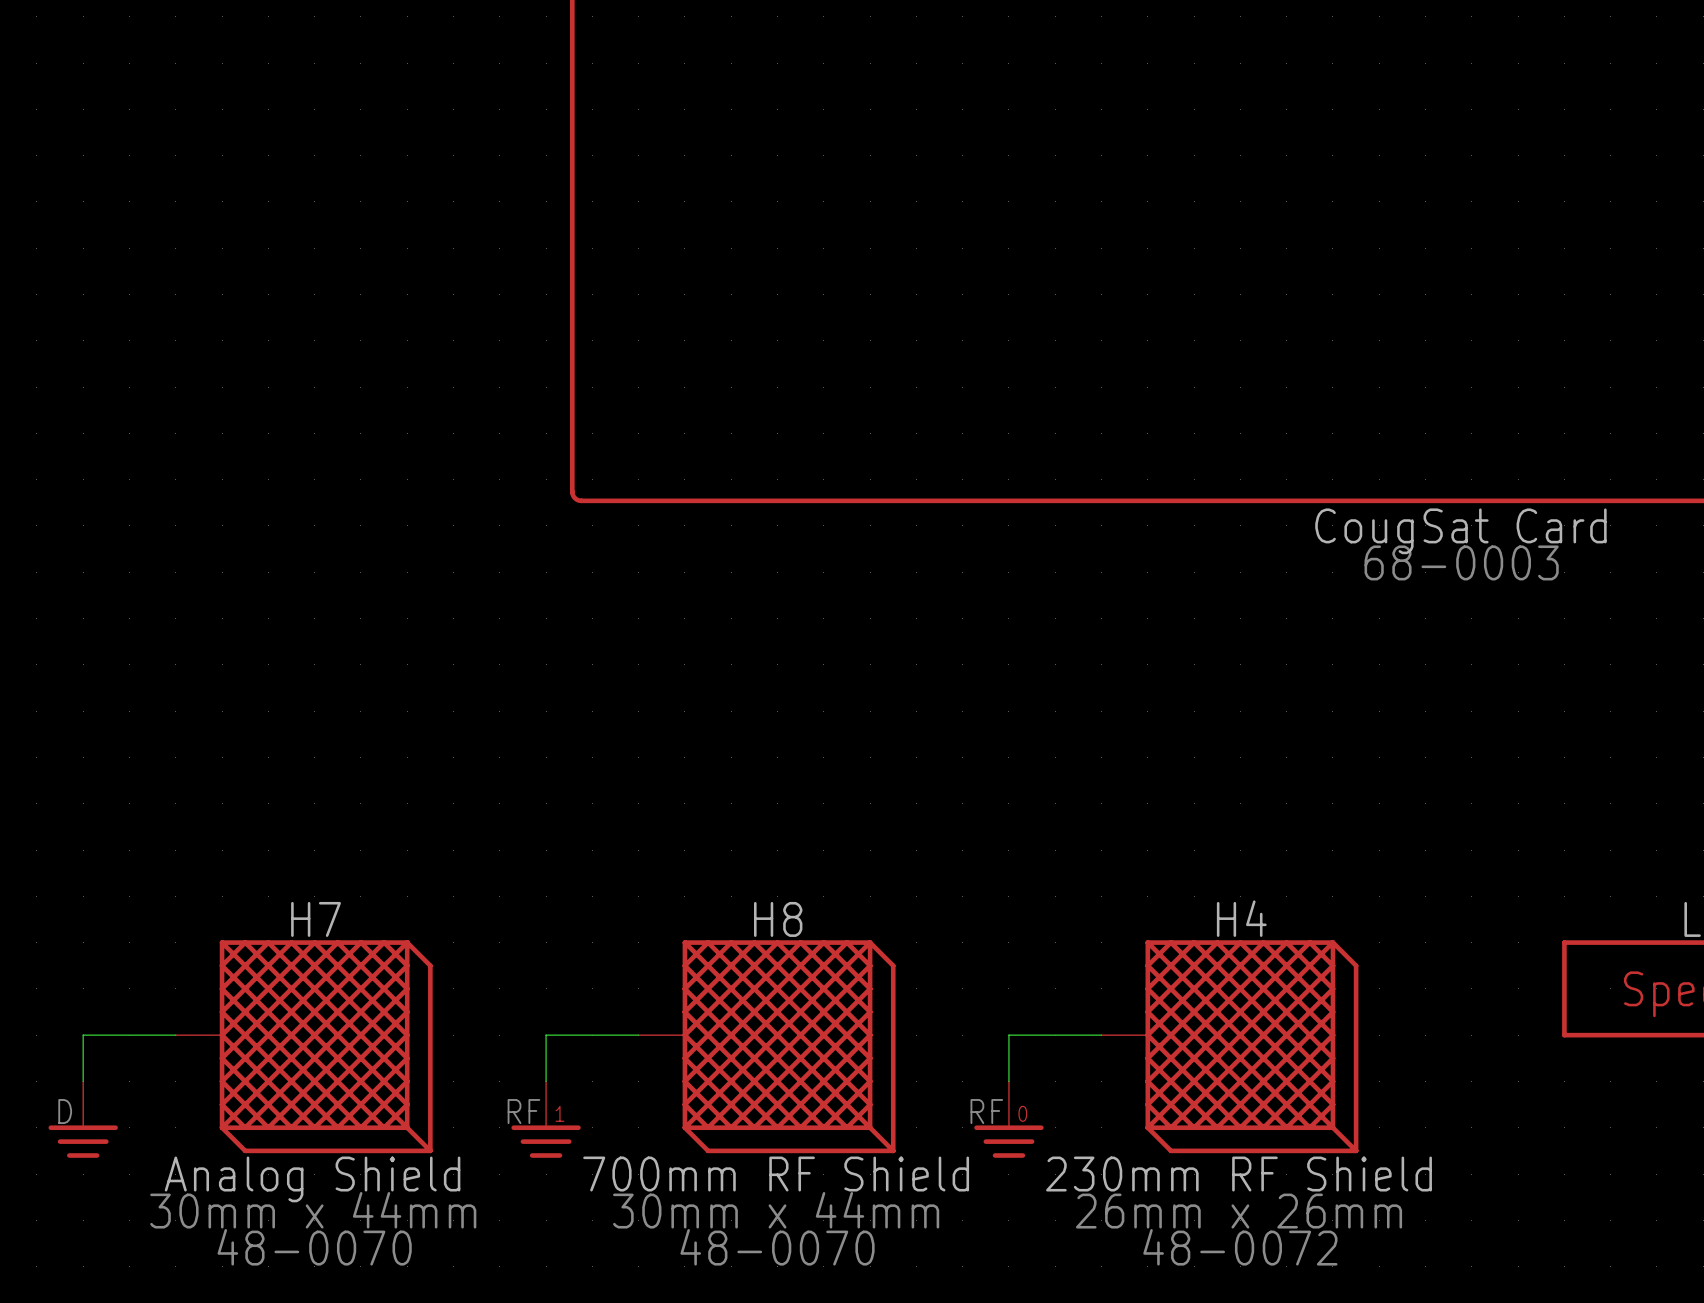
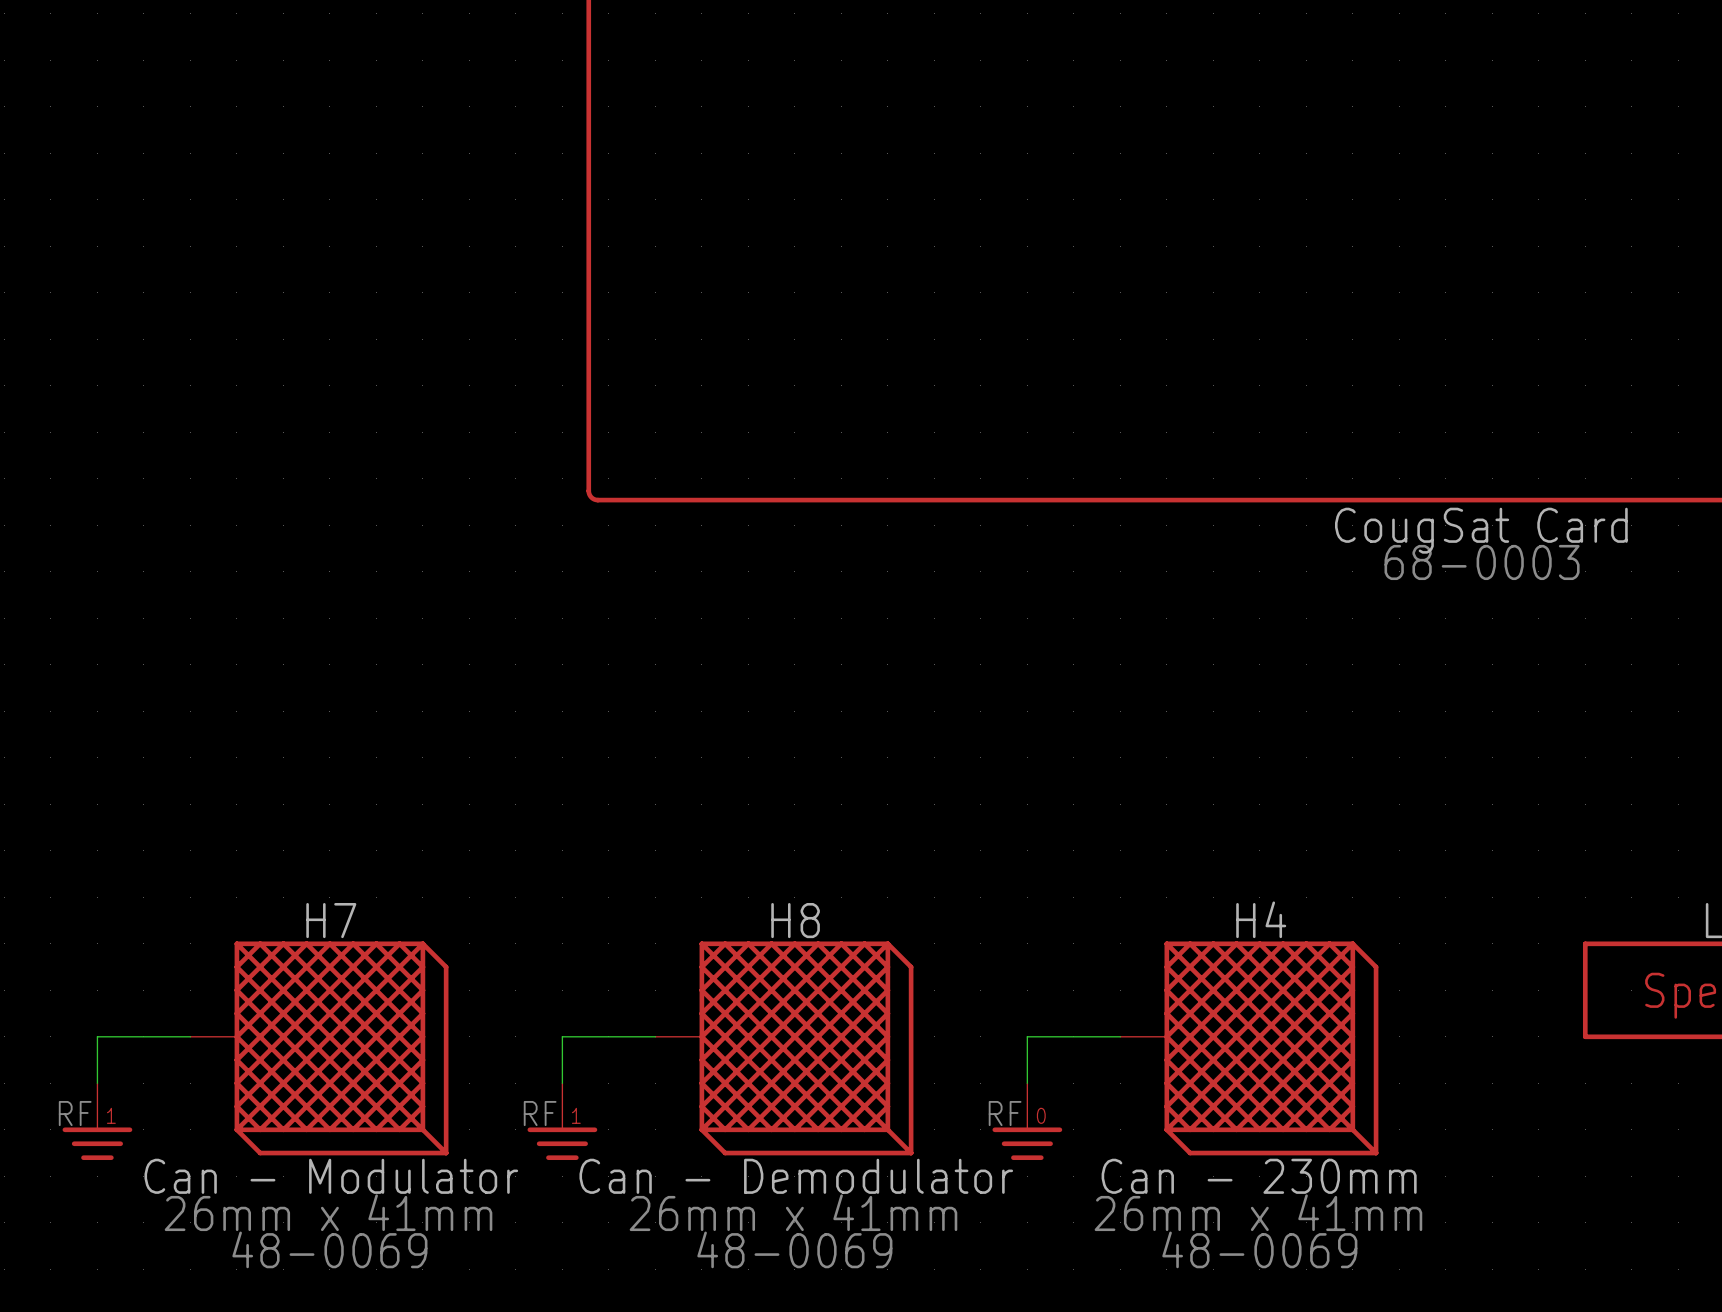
power symbol text: none -> RF (75, 1113)
power symbol text: D (65, 1111) -> none
power symbol text: none -> 1 (111, 1115)
H8 value: 700mm RF Shield (776, 1174) -> Can - Demodulator (796, 1176)
H4 value: 230mm RF Shield (1239, 1174) -> Can - 230mm (1259, 1176)
H7 value: Analog Shield (312, 1179) -> Can - Modulator (331, 1176)
H7 text: 30mm x 44mm (313, 1210) -> 26mm x 41mm (328, 1212)
H8 text: 30mm x 44mm (776, 1210) -> 26mm x 41mm (793, 1212)
H4 text: 26mm x 26mm (1239, 1211) -> 26mm x 41mm (1258, 1212)
H7 text: 48-0070 (314, 1247) -> 48-0069 (329, 1249)
H8 text: 48-0070 (777, 1247) -> 48-0069 (794, 1249)
H4 text: 48-0072 (1240, 1247) -> 48-0069 (1259, 1249)

